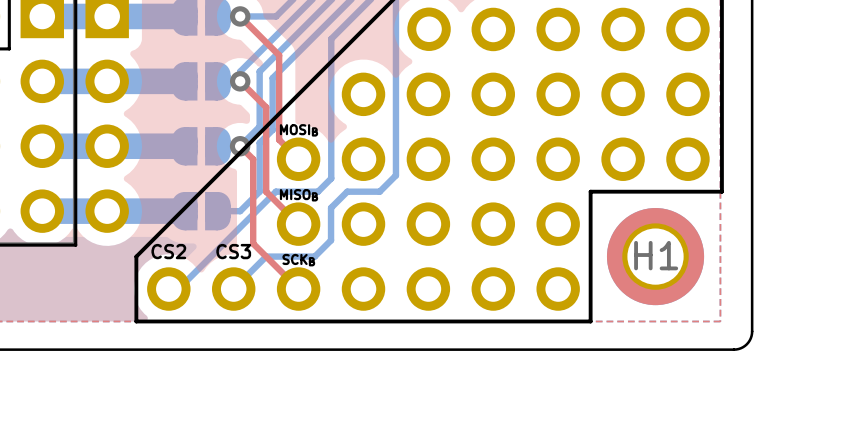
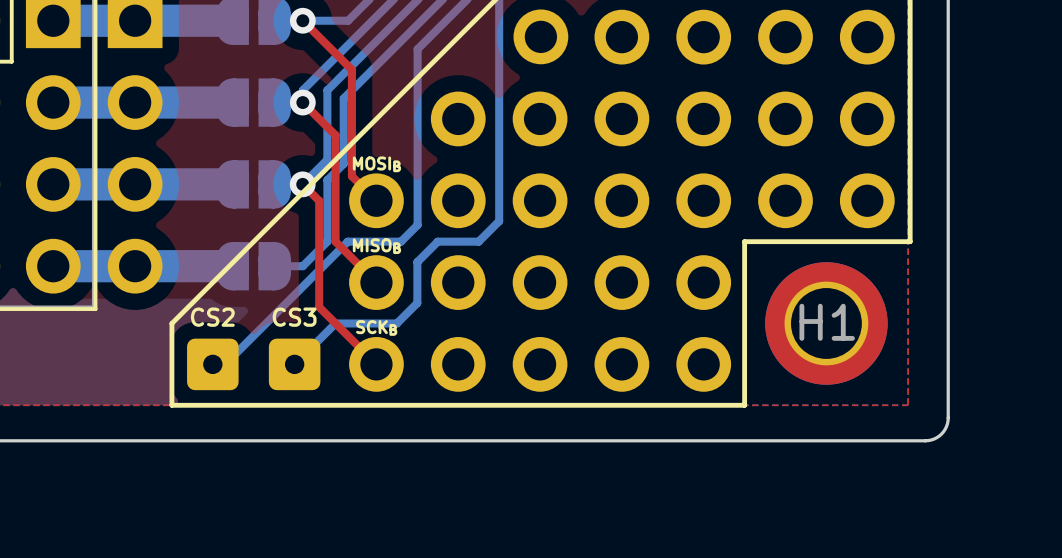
part footprint: [147, 267, 191, 311] -> [187, 338, 239, 391]
part footprint: [211, 267, 256, 311] -> [268, 338, 321, 391]

